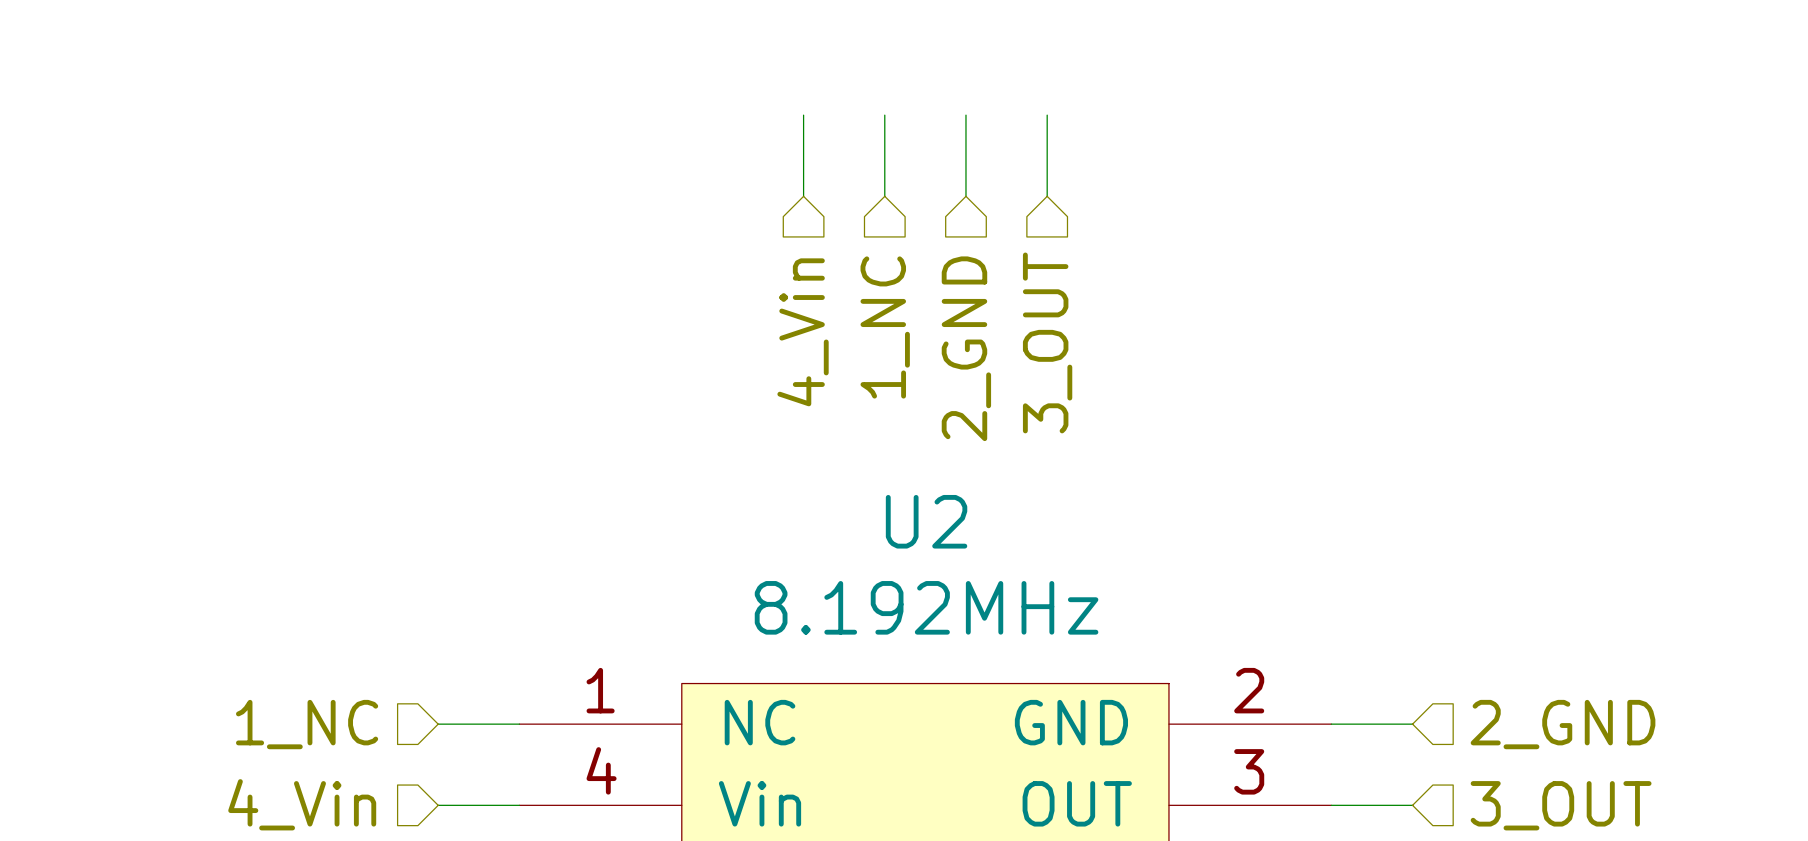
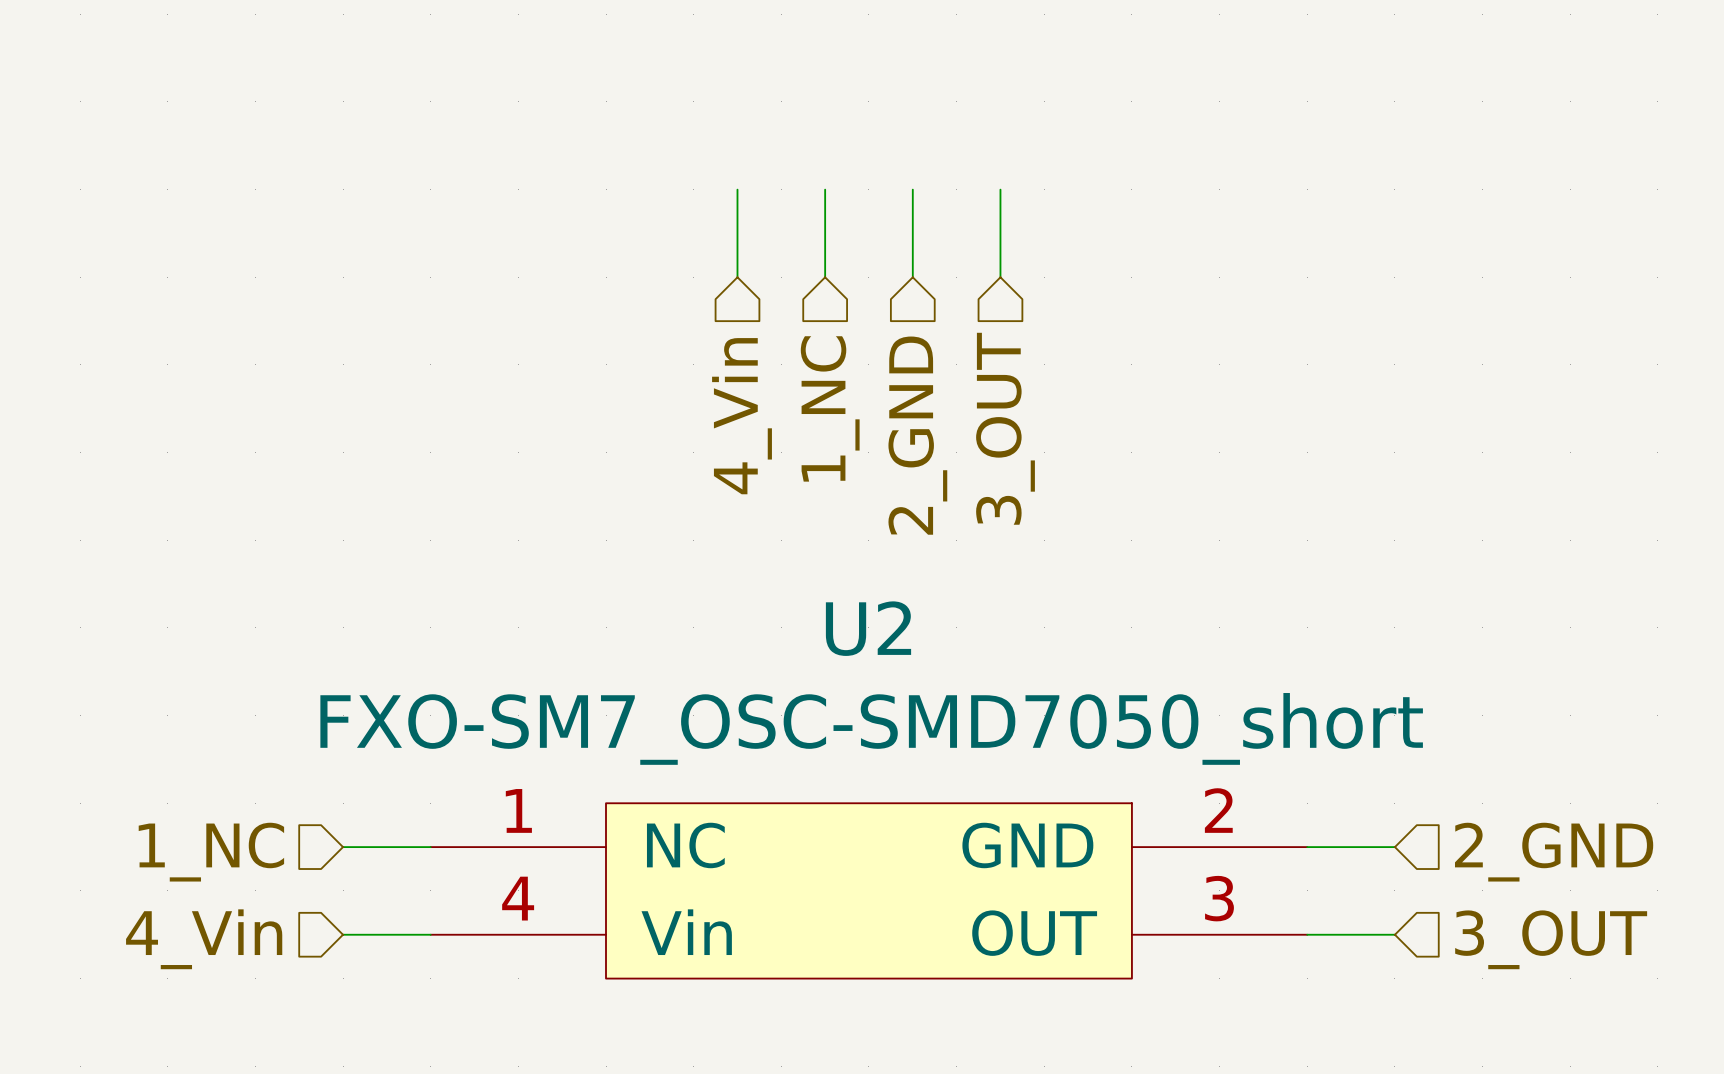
U2 value: 8.192MHz (926, 607) -> FXO-SM7_OSC-SMD7050_short (871, 728)

